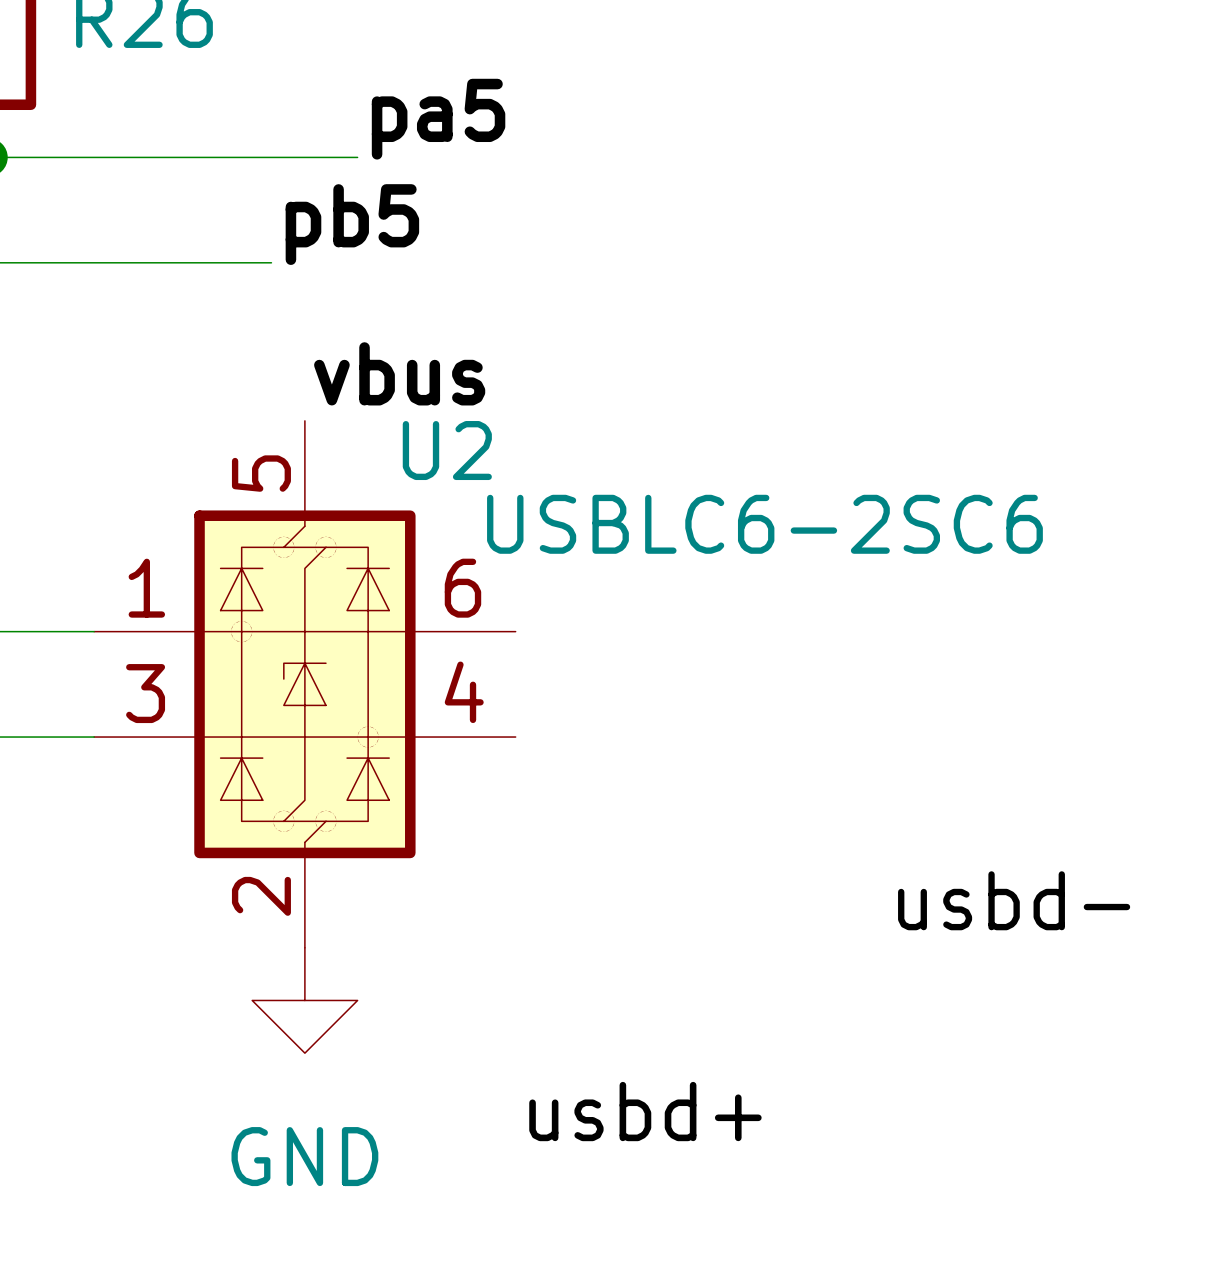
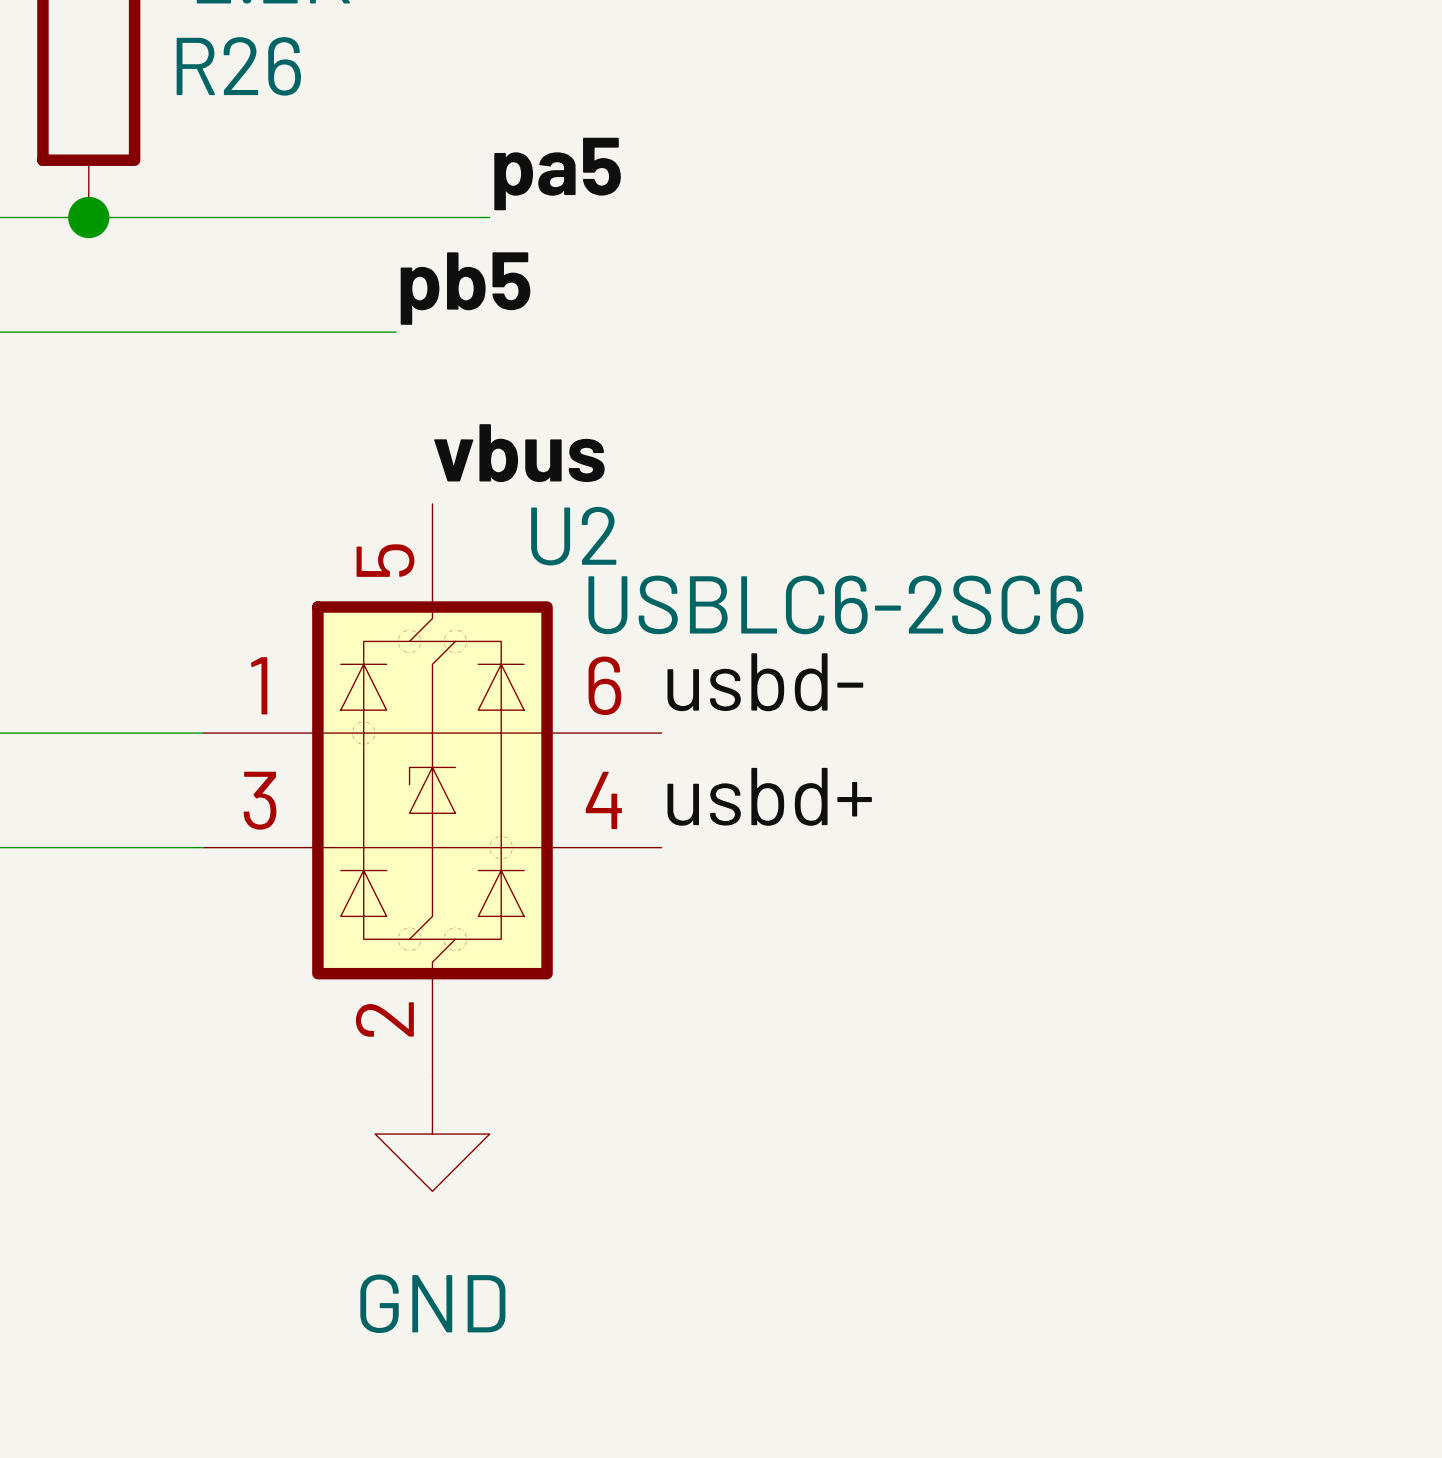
U2 value position: USBLC6-2SC6 (764, 524) -> USBLC6-2SC6 (835, 604)
label position: usbd- (1014, 900) -> usbd- (765, 682)
label position: usbd+ (645, 1111) -> usbd+ (769, 796)

